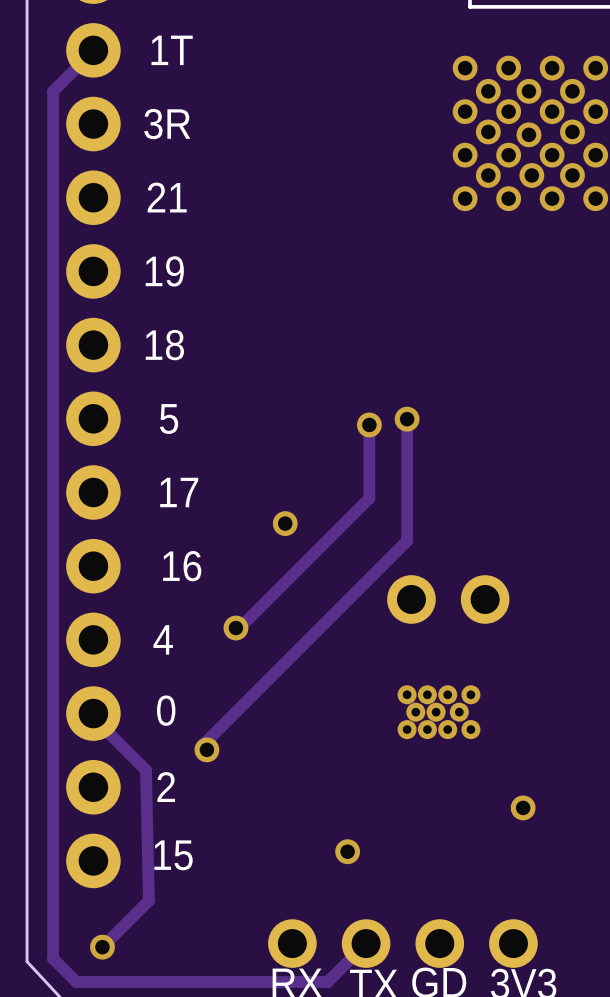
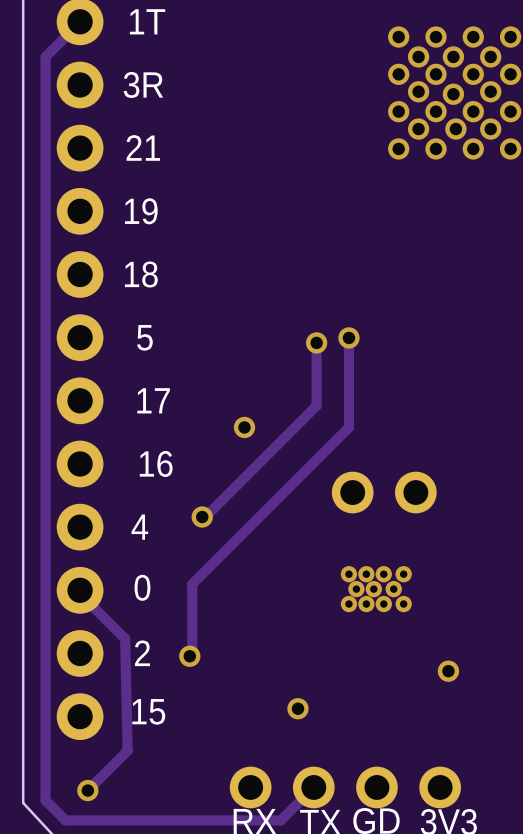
track: (407, 523) (407, 541) (206, 741) (206, 749) -> (348, 427) (192, 584) (192, 653) (189, 656)
via position: (206, 749) -> (189, 656)

